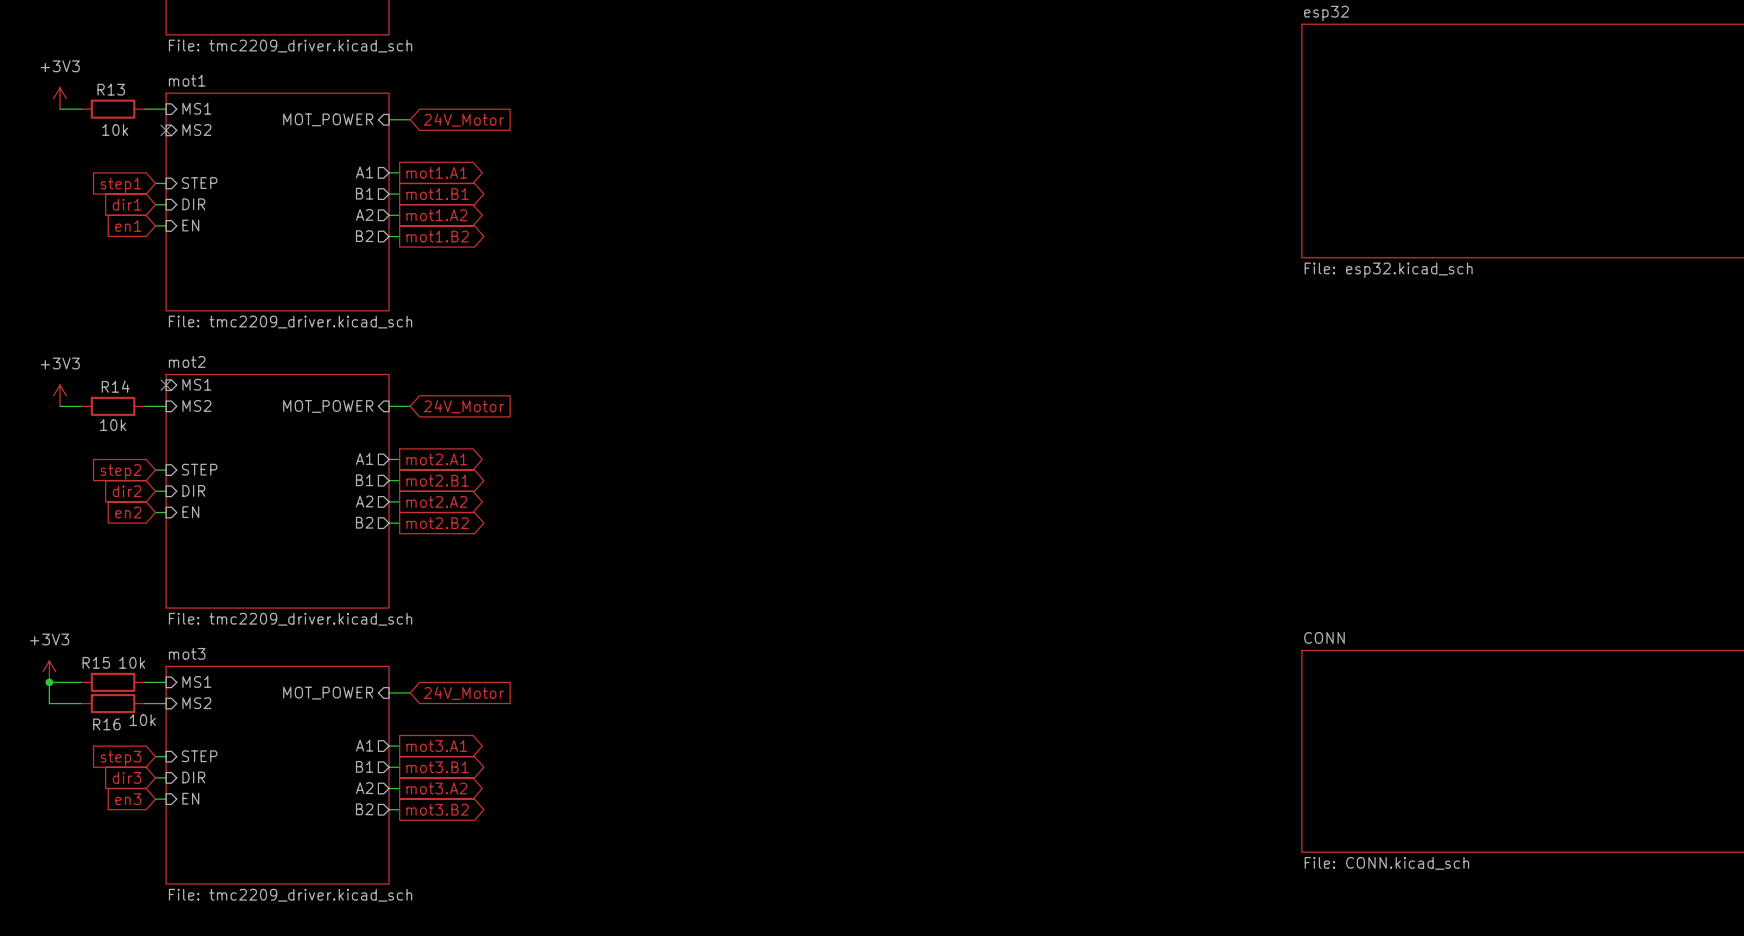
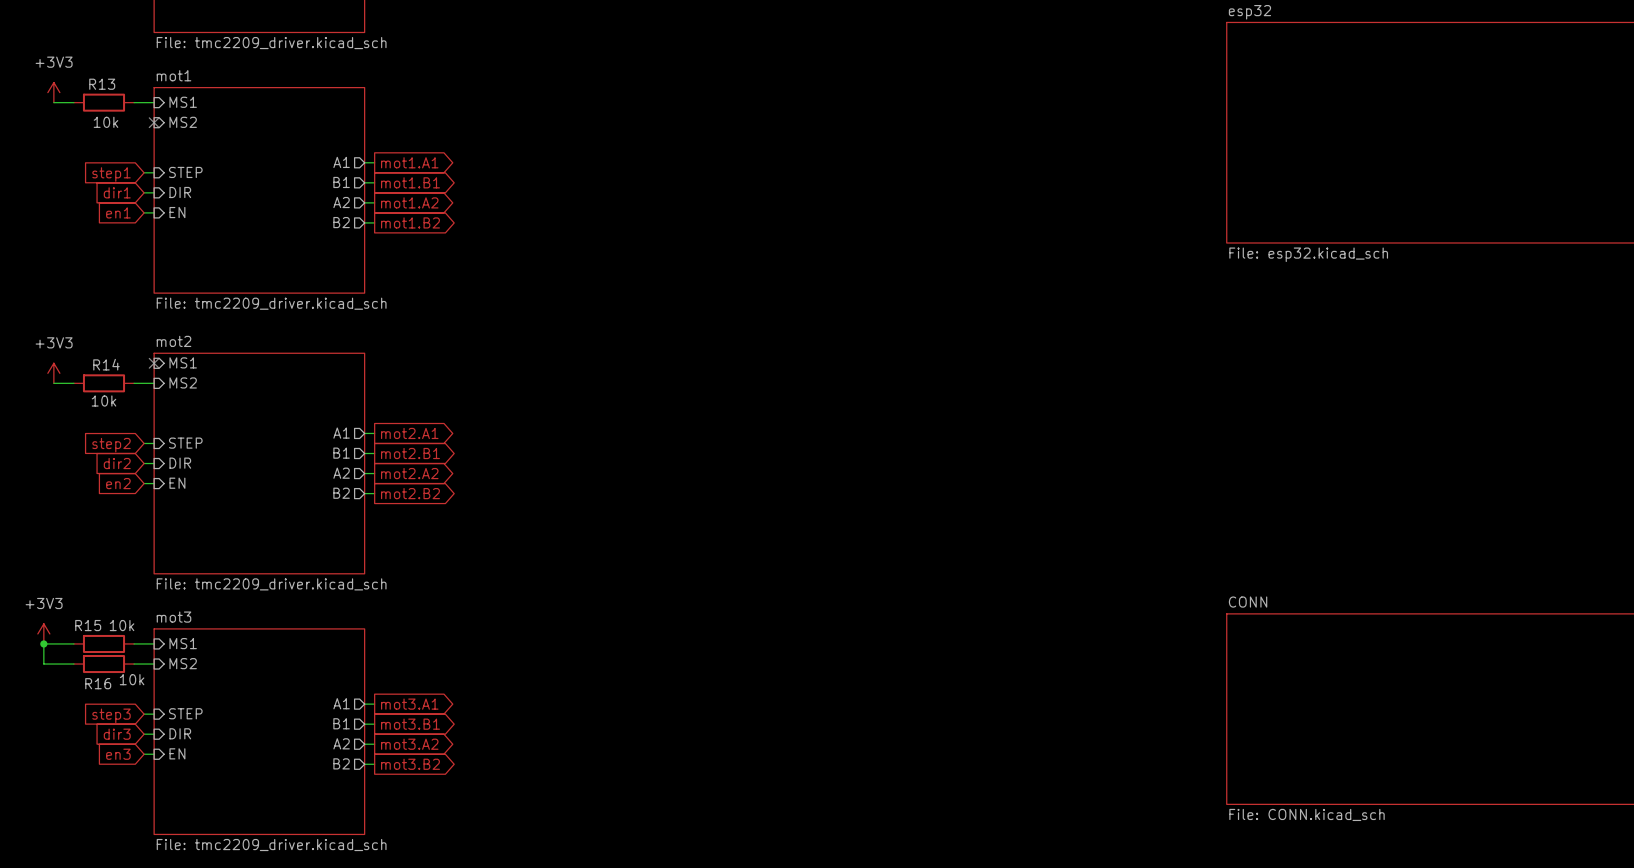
sheet pin: MOT_POWER (328, 119) -> none
wire: (389, 119) (410, 119) -> none
global label: 24V_Motor (463, 120) -> none
sheet pin: MOT_POWER (328, 406) -> none
wire: (389, 406) (410, 406) -> none
global label: 24V_Motor (463, 406) -> none
wire: (389, 692) (410, 692) -> none
sheet pin: MOT_POWER (328, 693) -> none
global label: 24V_Motor (463, 693) -> none

